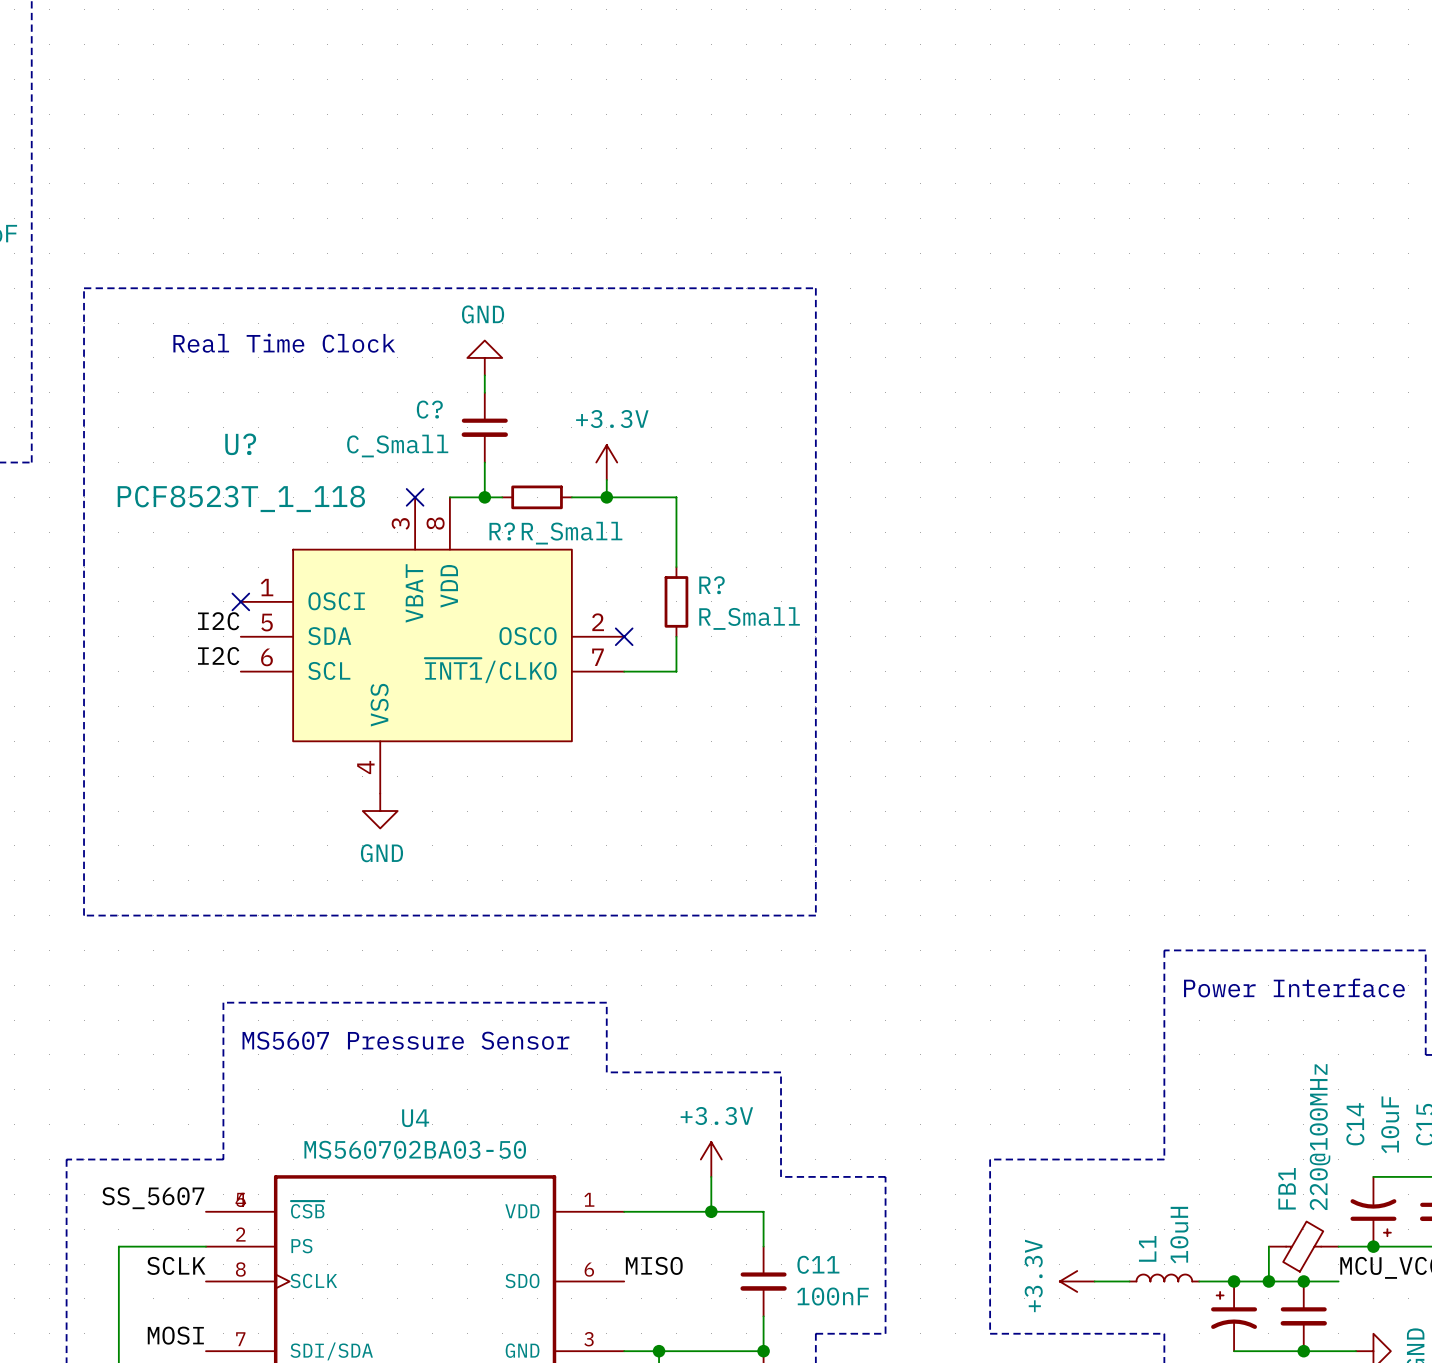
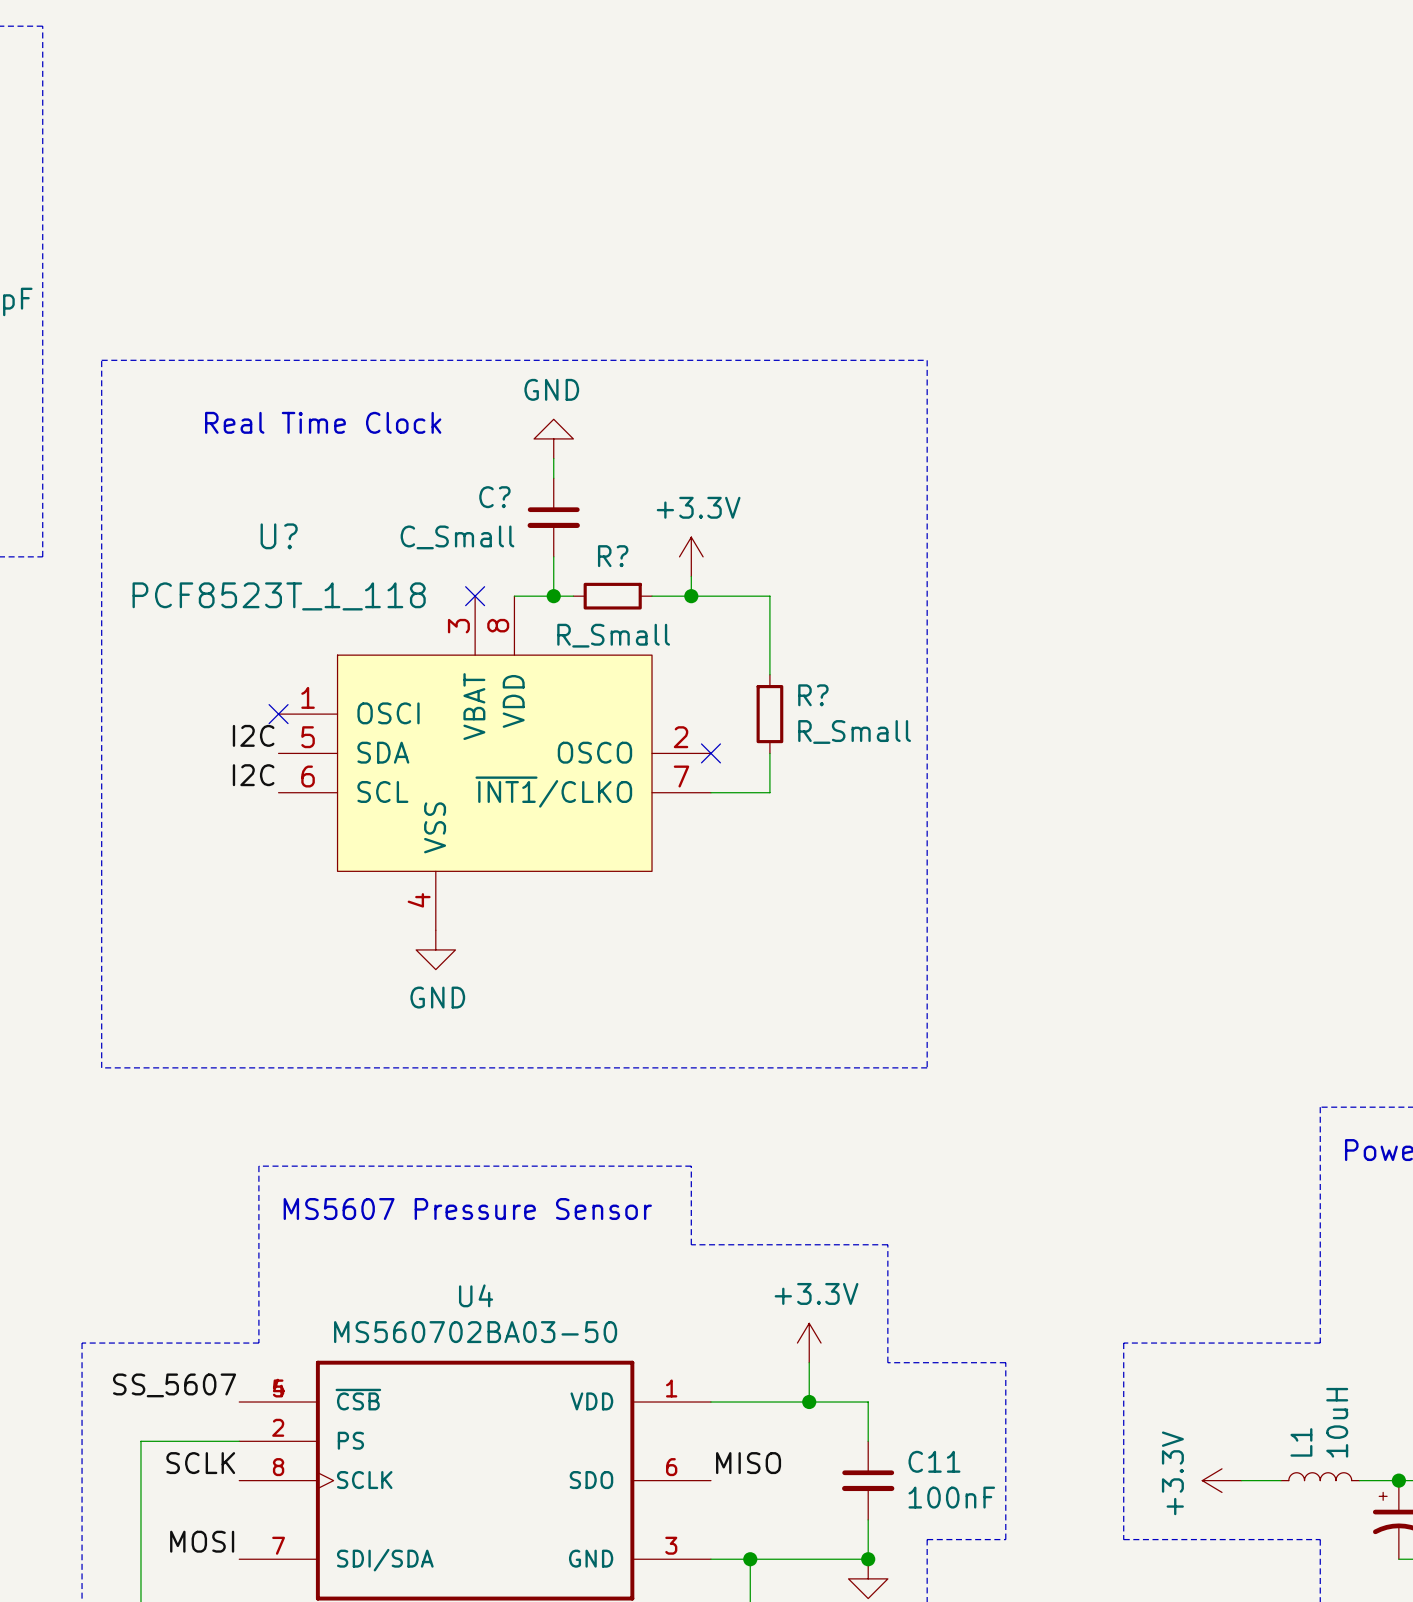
R? name position: R? (502, 531) -> R? (613, 556)
R? value position: R_Small (572, 533) -> R_Small (613, 635)

